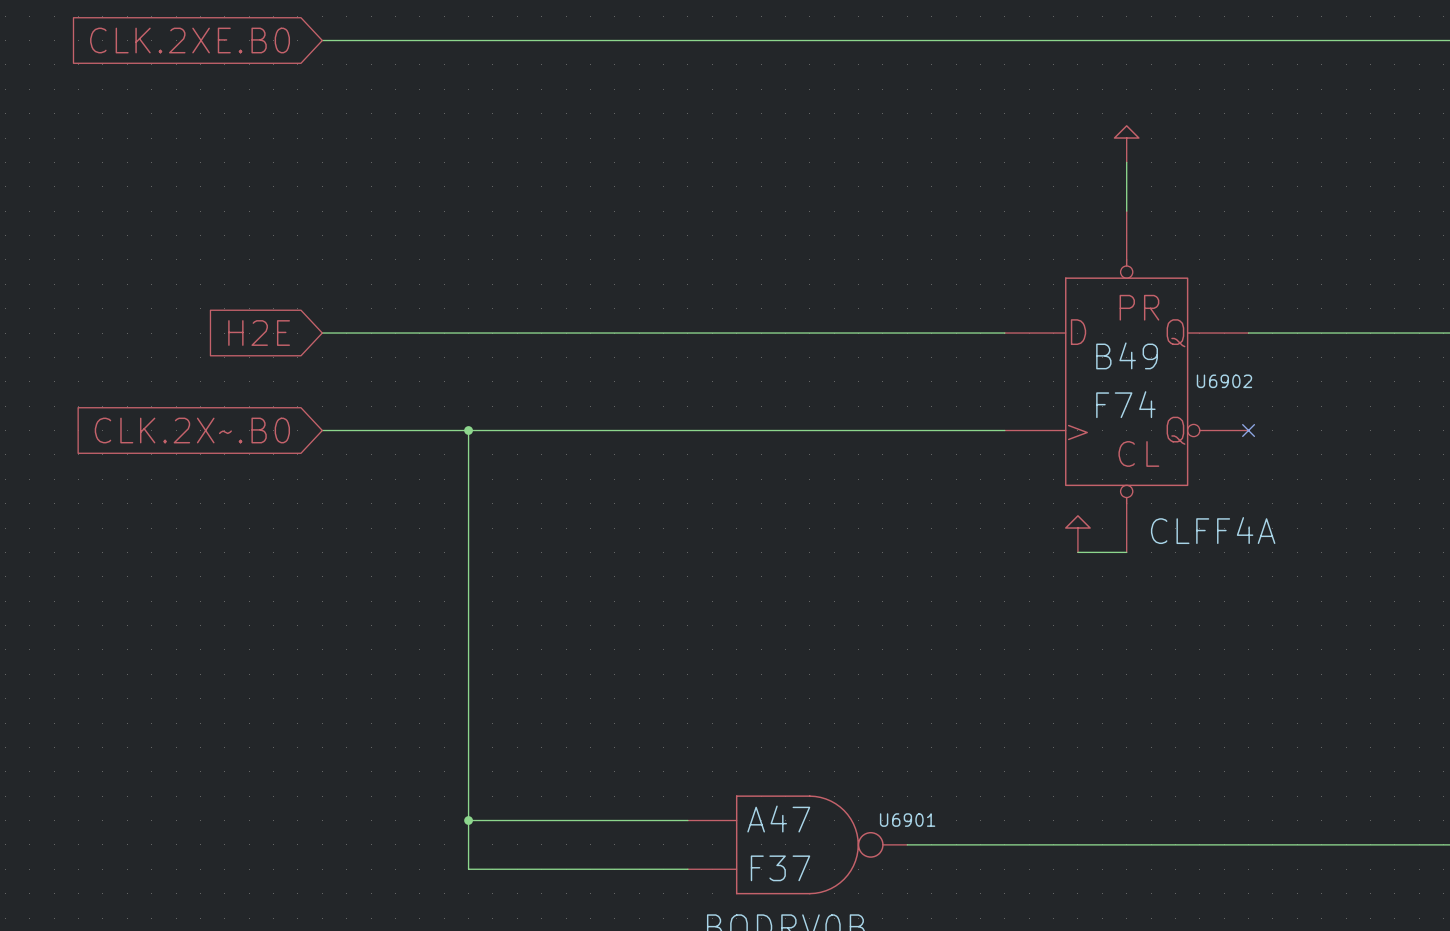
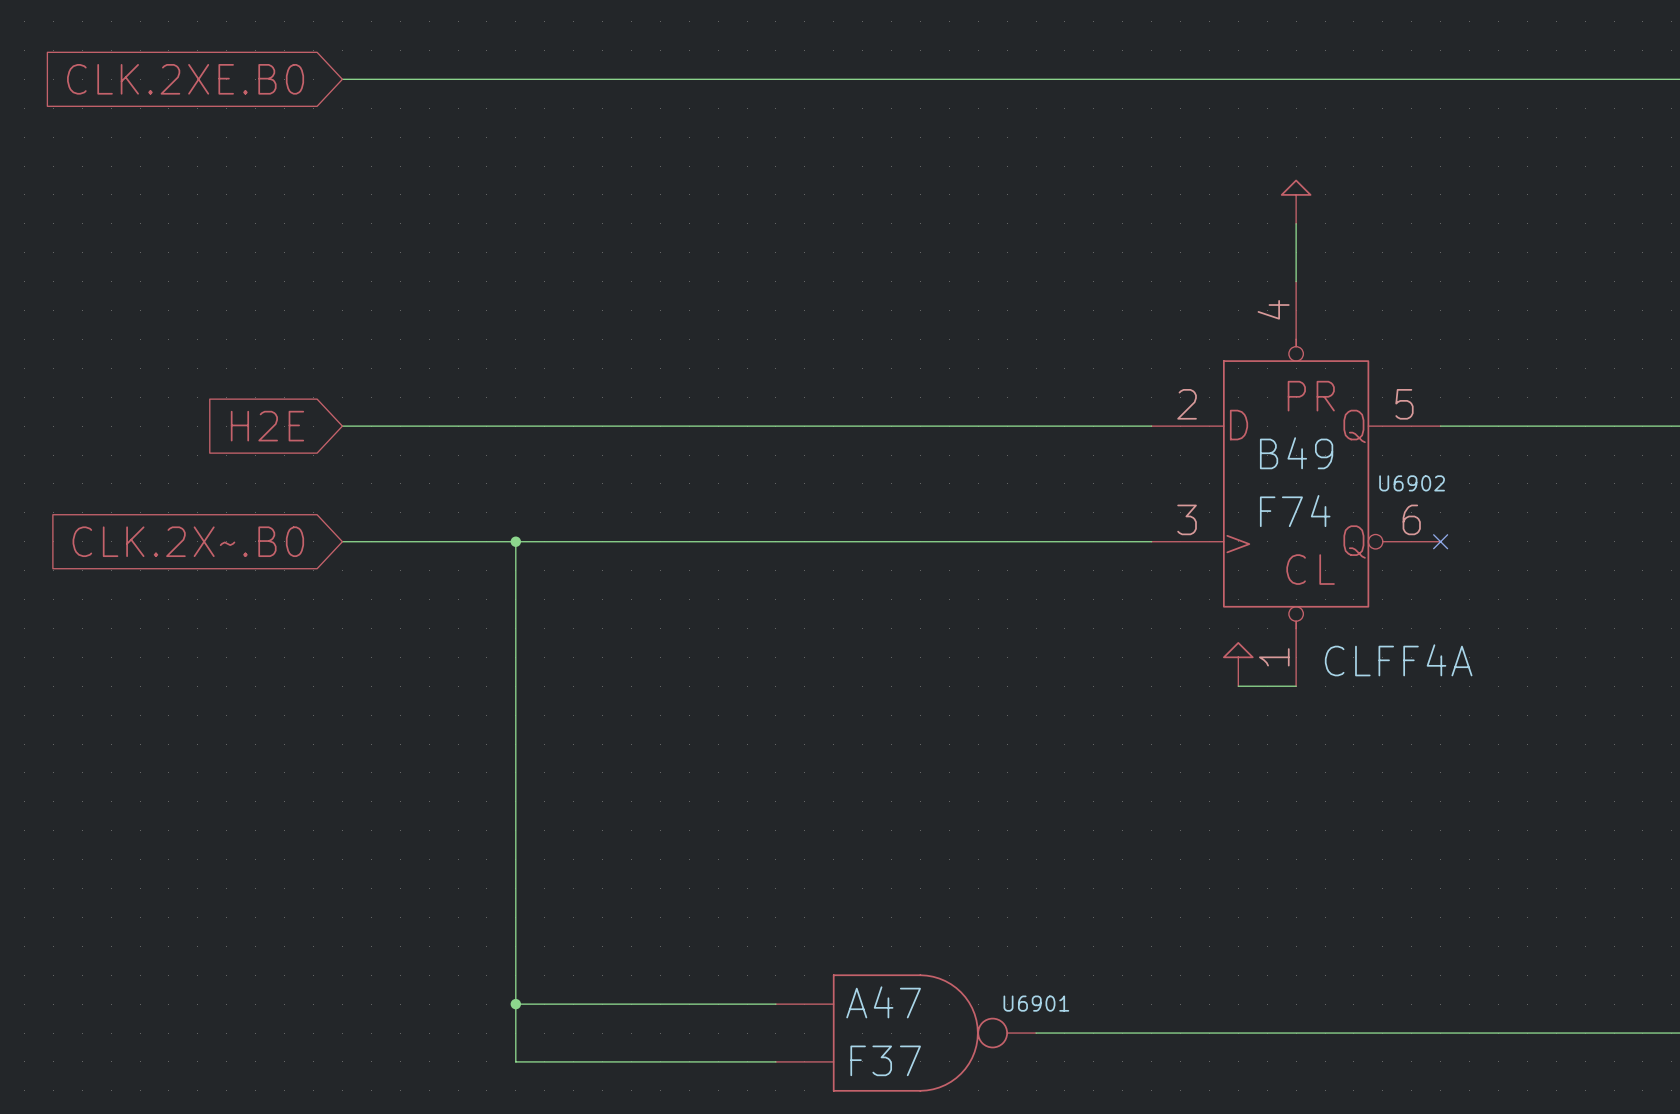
U6902 pin number: none -> 4 (1273, 309)
U6902 pin number: none -> 2 (1187, 404)
U6902 pin number: none -> 5 (1404, 404)
U6902 pin number: none -> 3 (1187, 519)
U6902 pin number: none -> 6 (1411, 519)
U6902 pin number: none -> 1 (1274, 657)

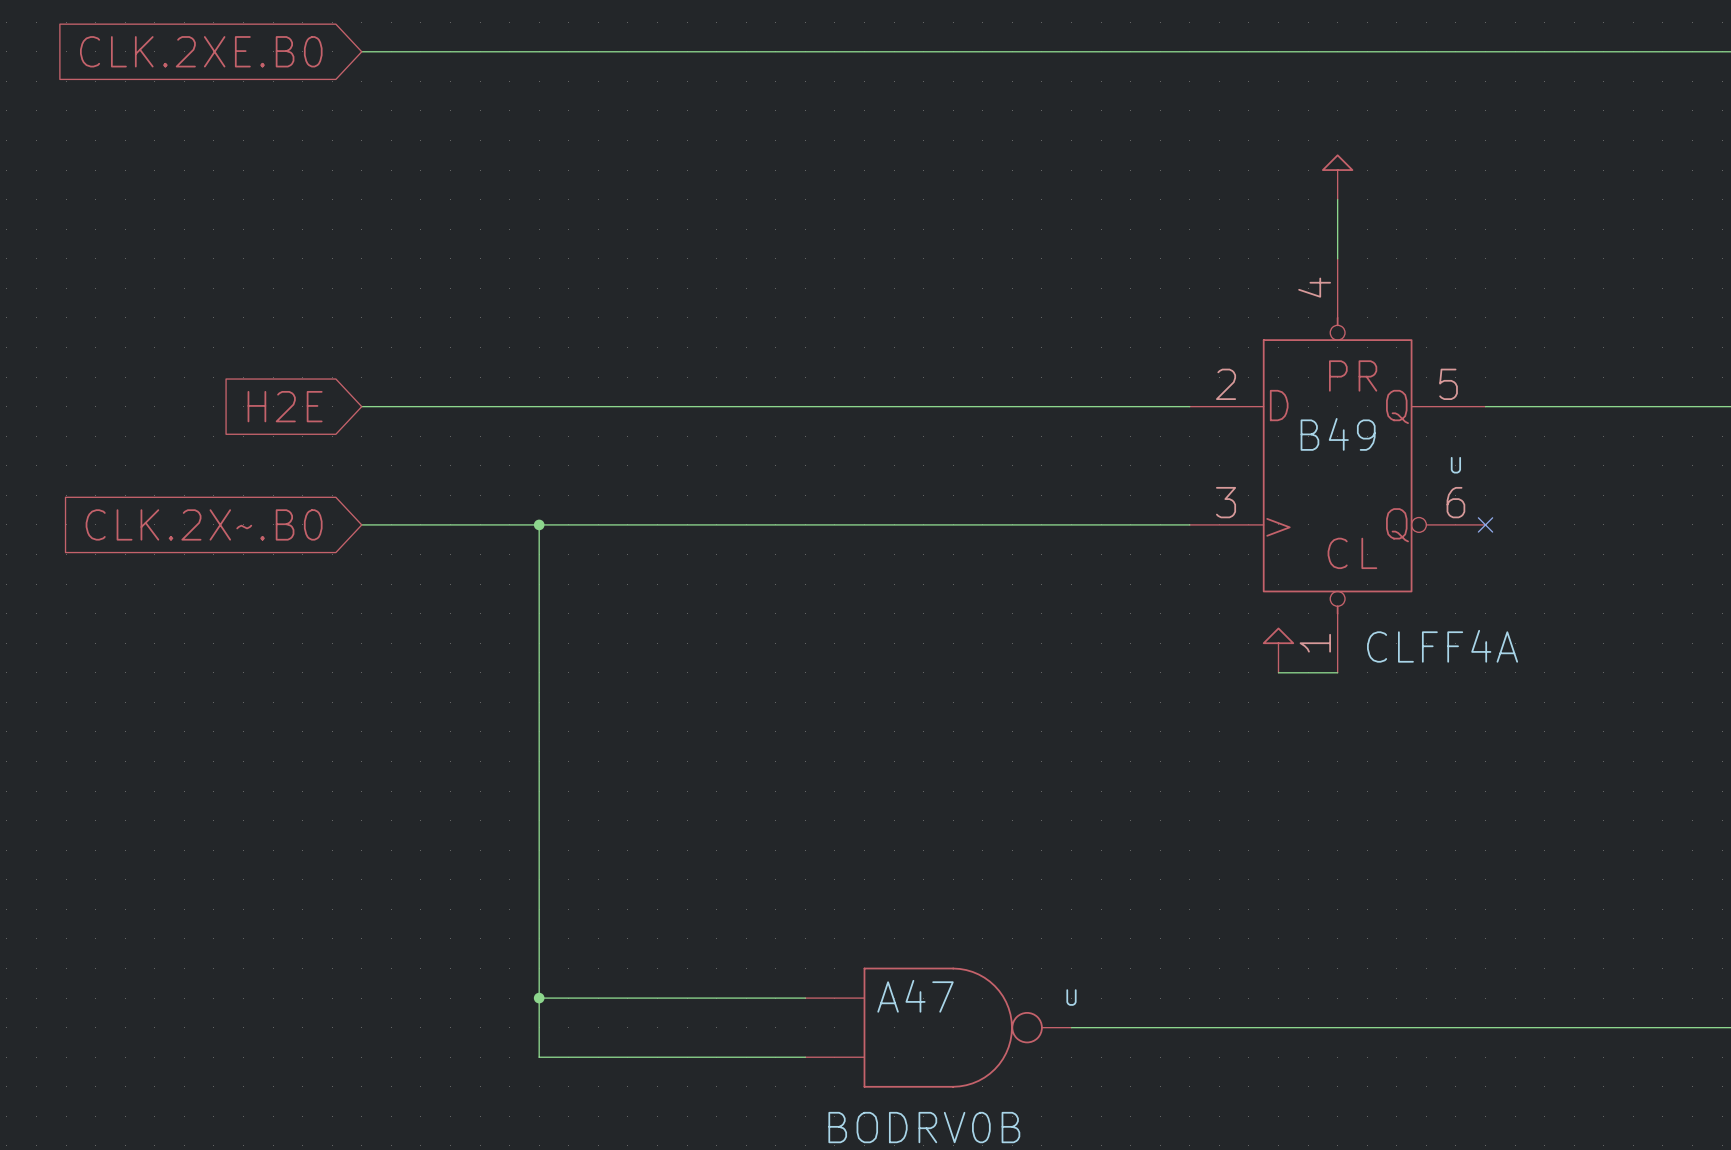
U6902 name: U6902 (1412, 483) -> U (1455, 465)
U6902 value: F74 (1295, 511) -> none
U6901 name: U6901 (1036, 1003) -> U (1071, 997)
U6901 value: F37 (885, 1060) -> none

